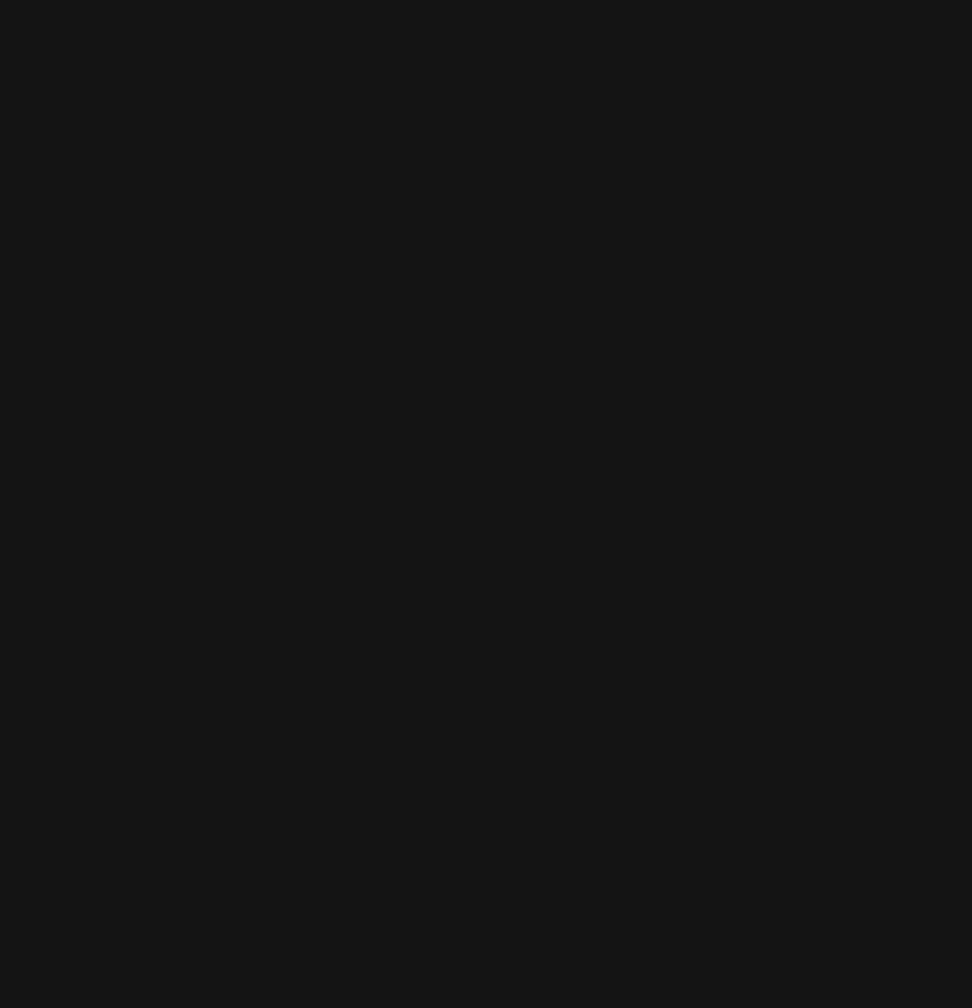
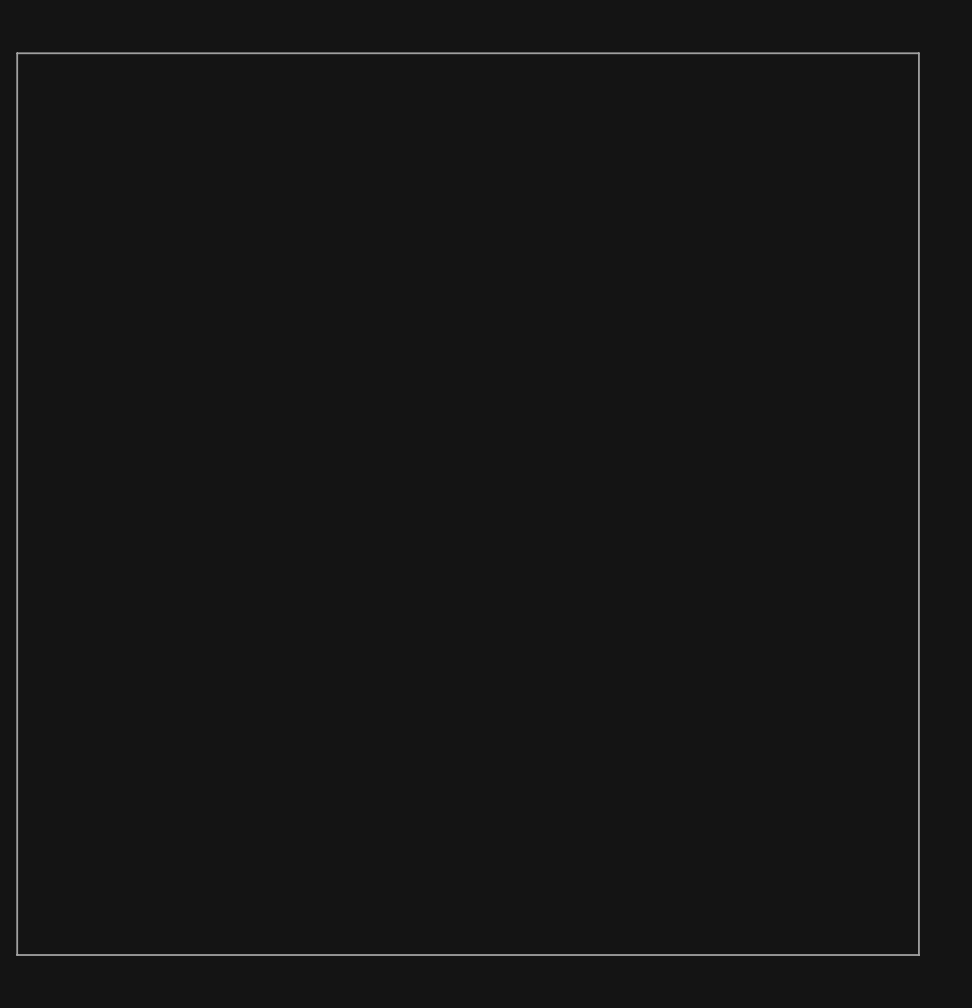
board edge: none -> (17, 53) (918, 53) (918, 955) (17, 955) (17, 53)

